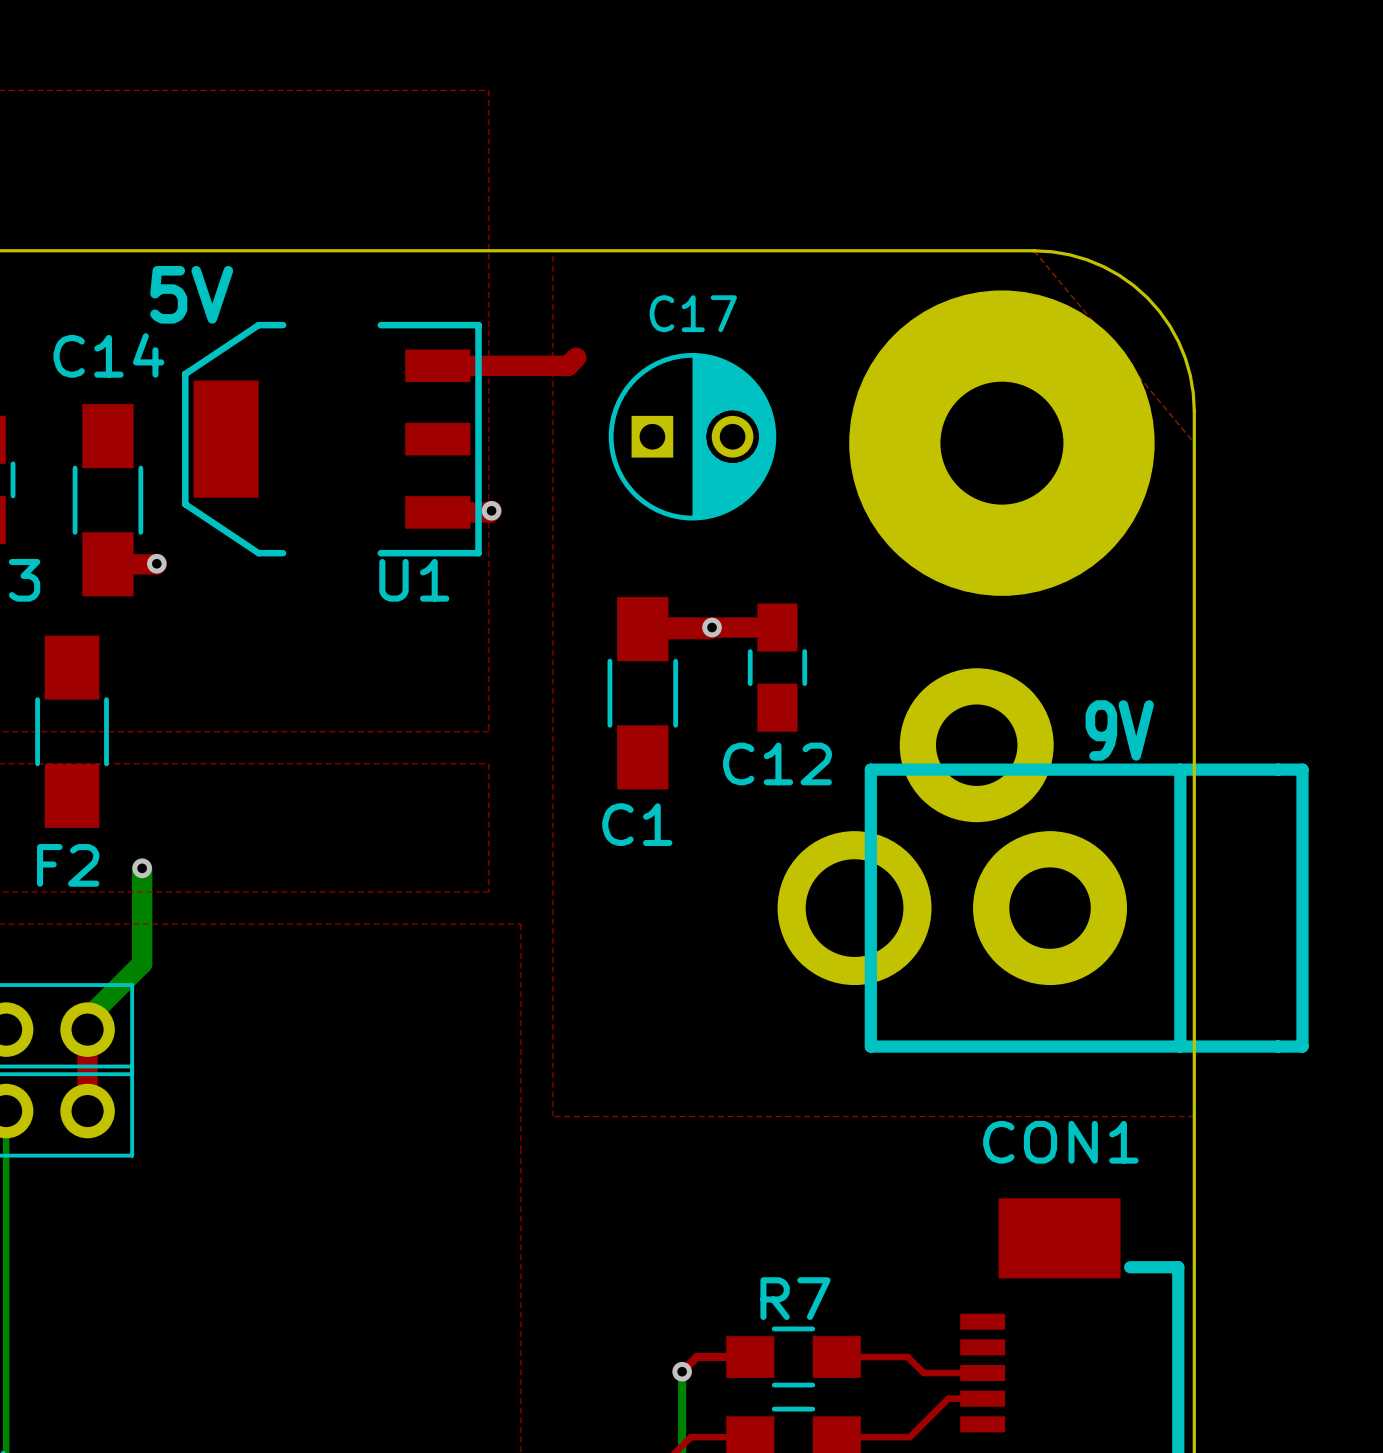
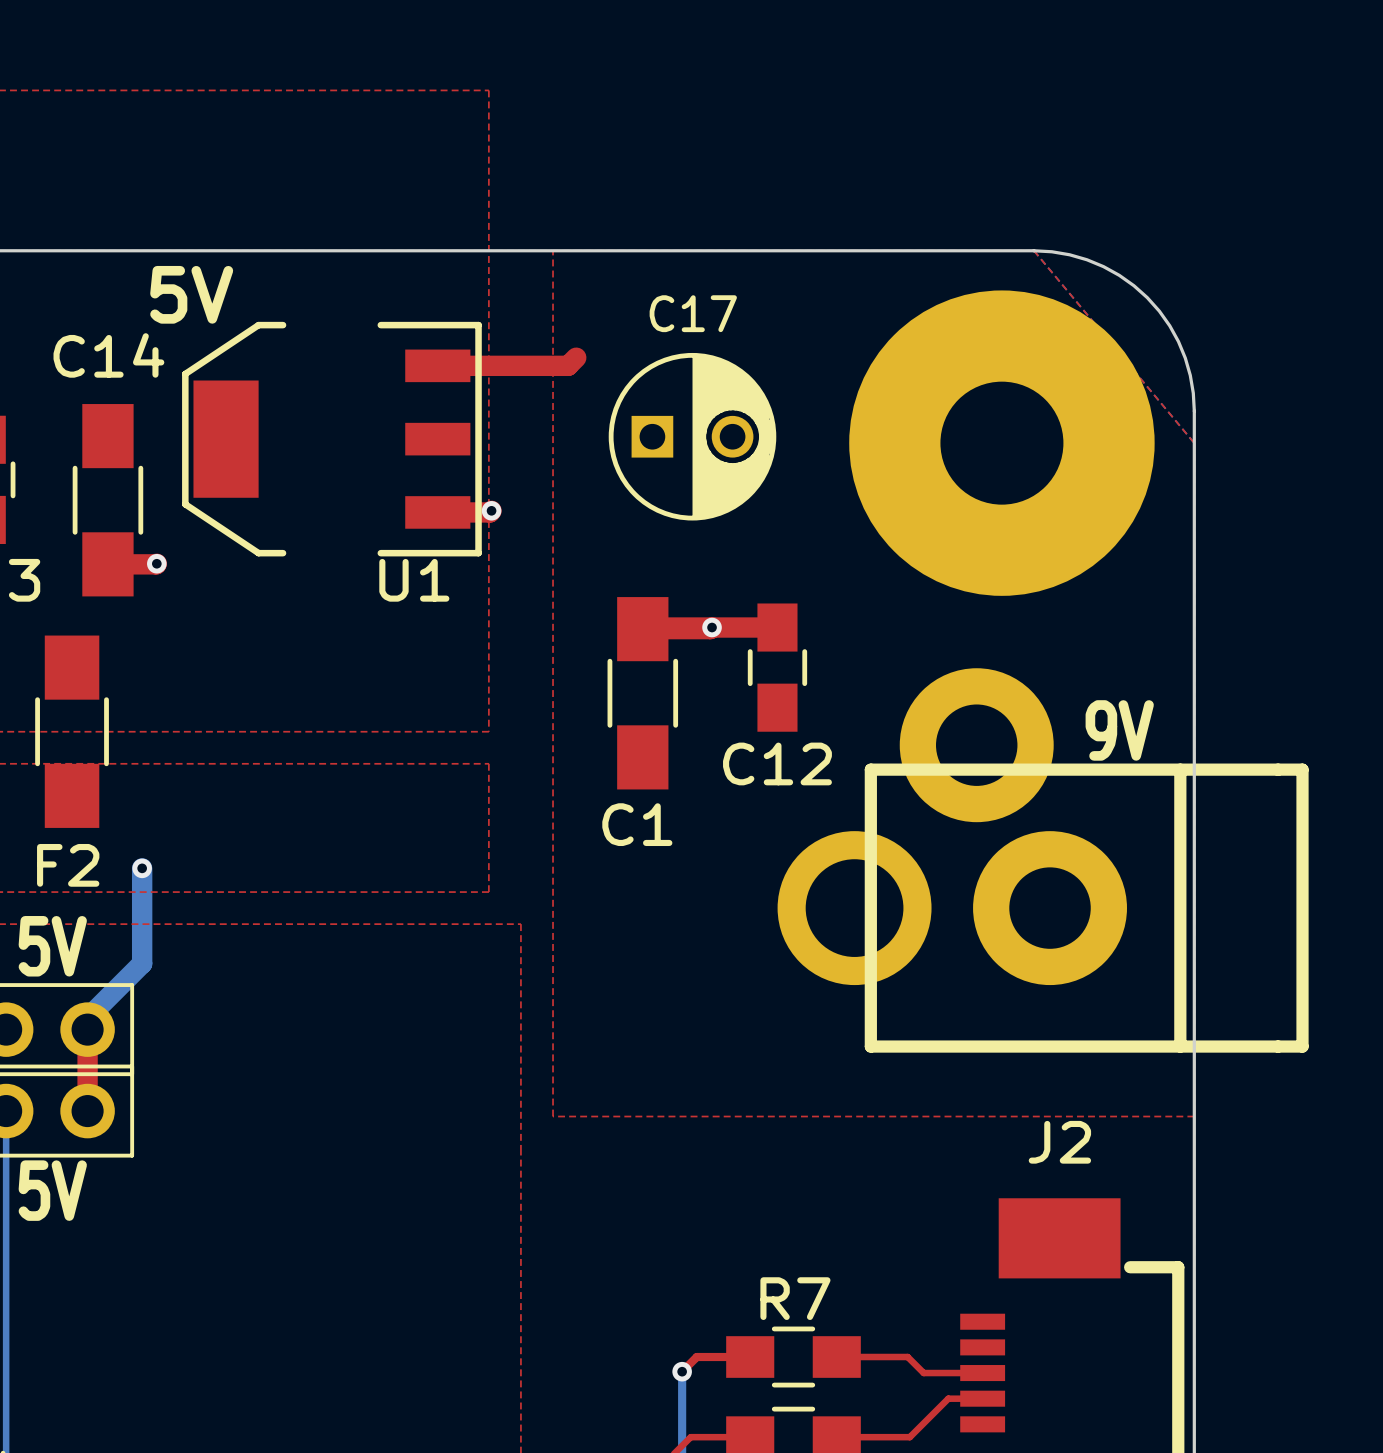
text: none -> 5V (52, 946)
CON1 name: CON1 (1060, 1142) -> J2 (1059, 1142)
text: none -> 5V (52, 1190)

